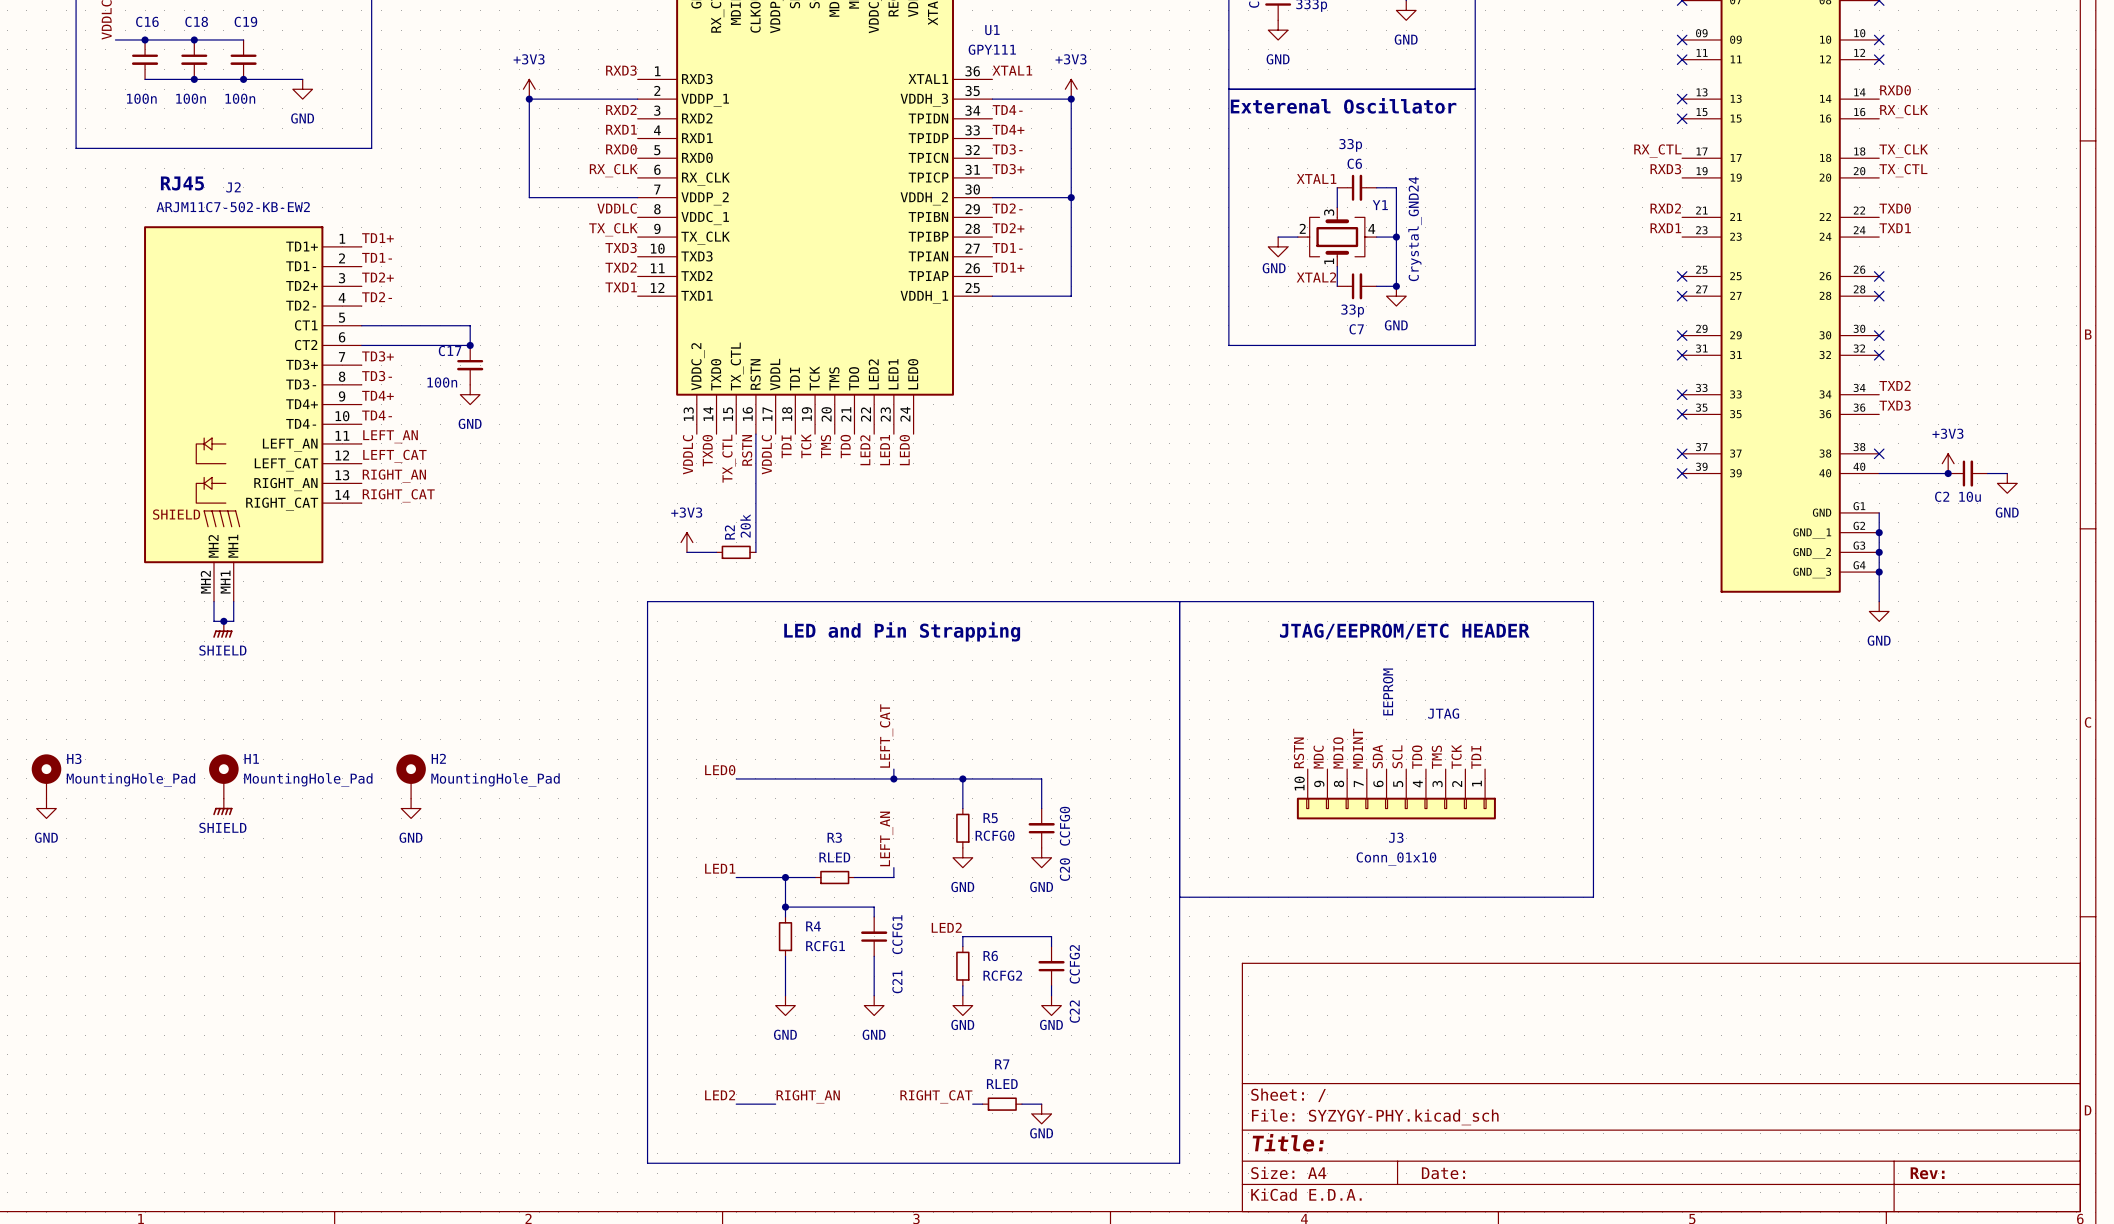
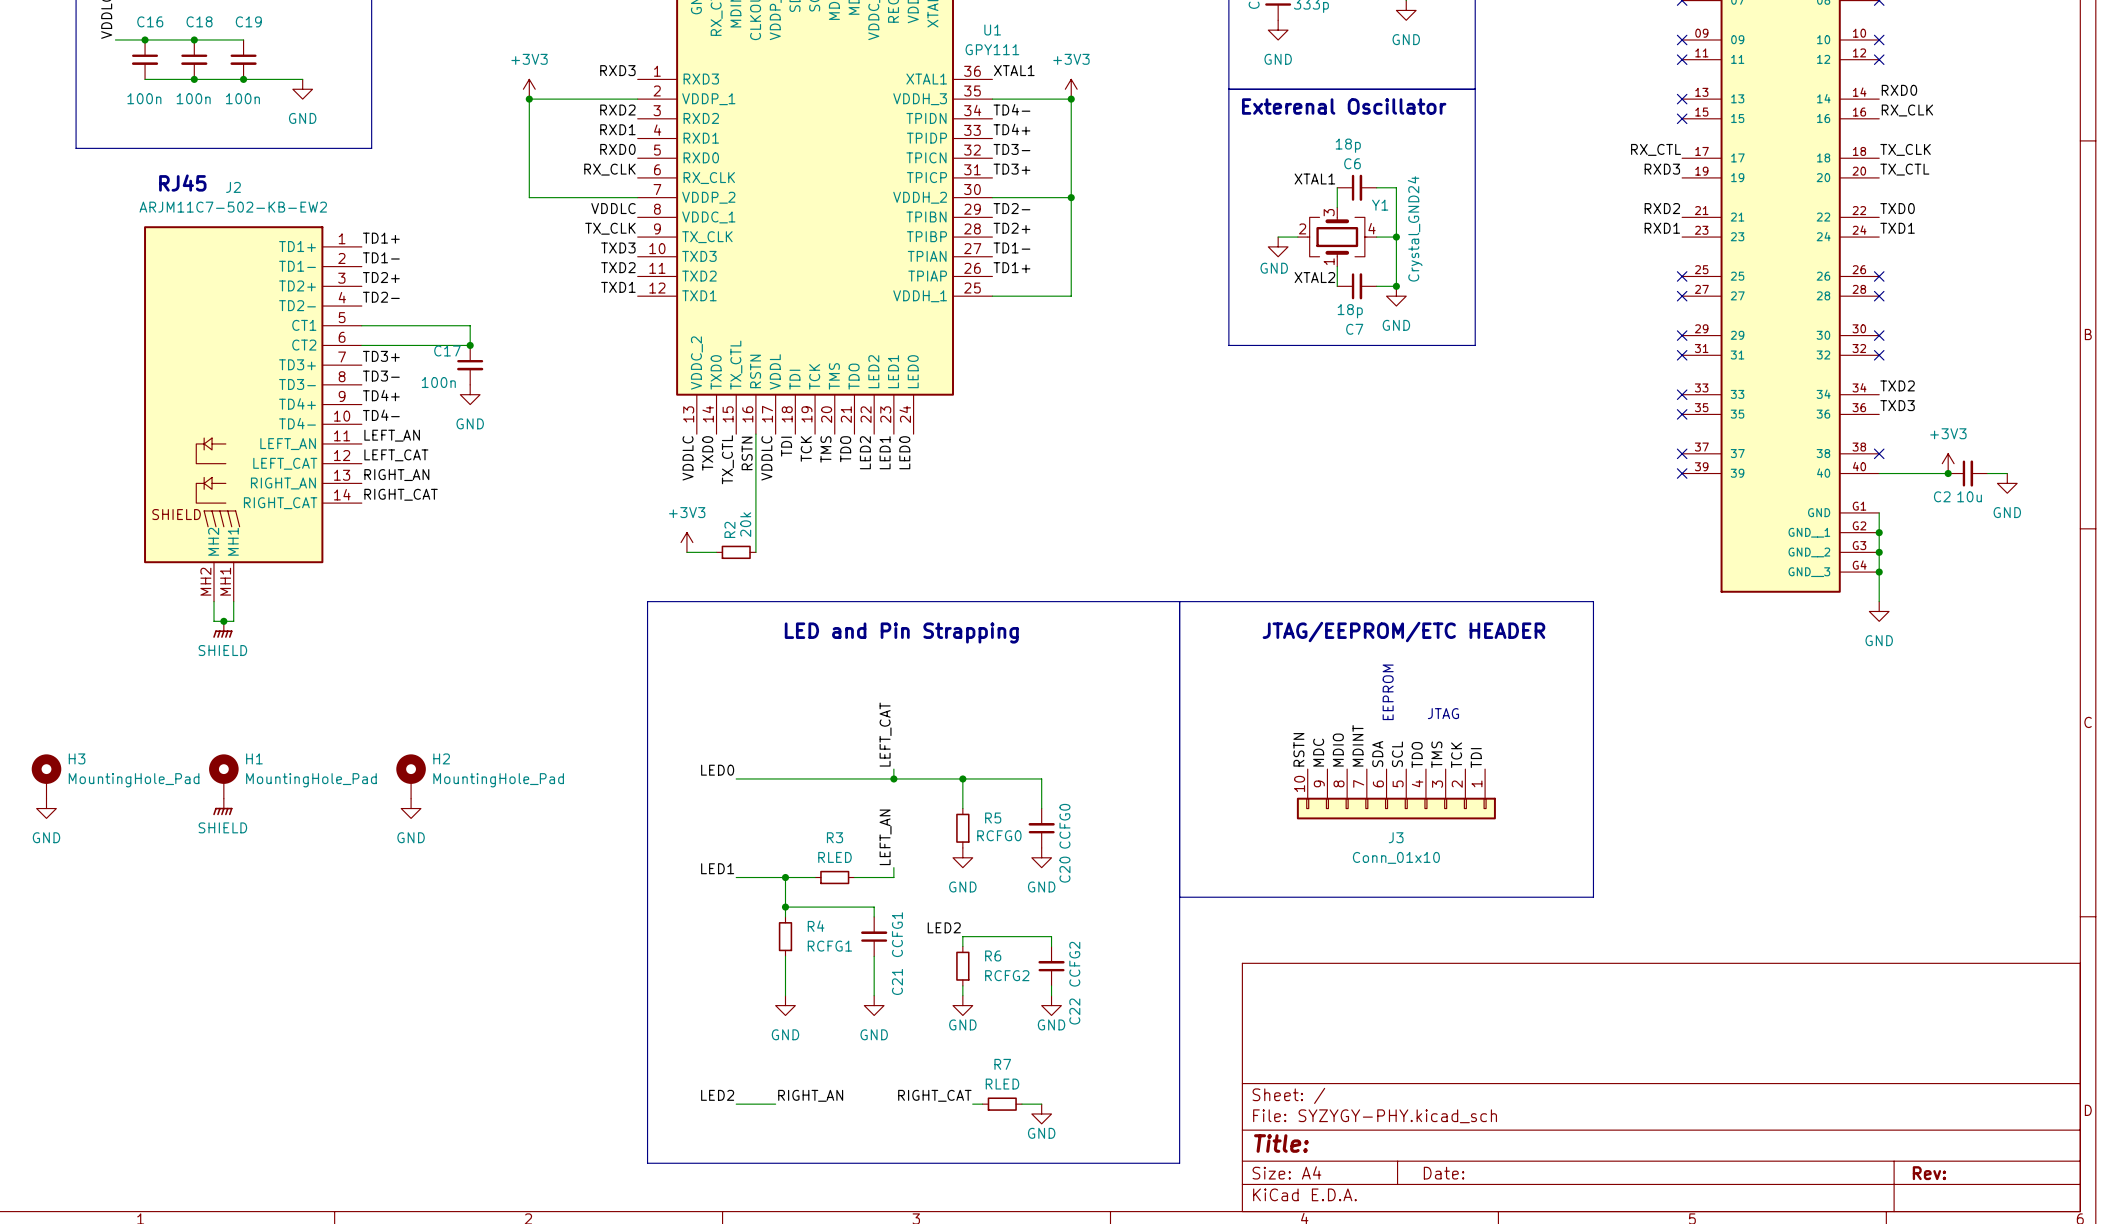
C6 value: 33p (1350, 145) -> 18p (1348, 145)
C7 value: 33p (1352, 310) -> 18p (1350, 311)

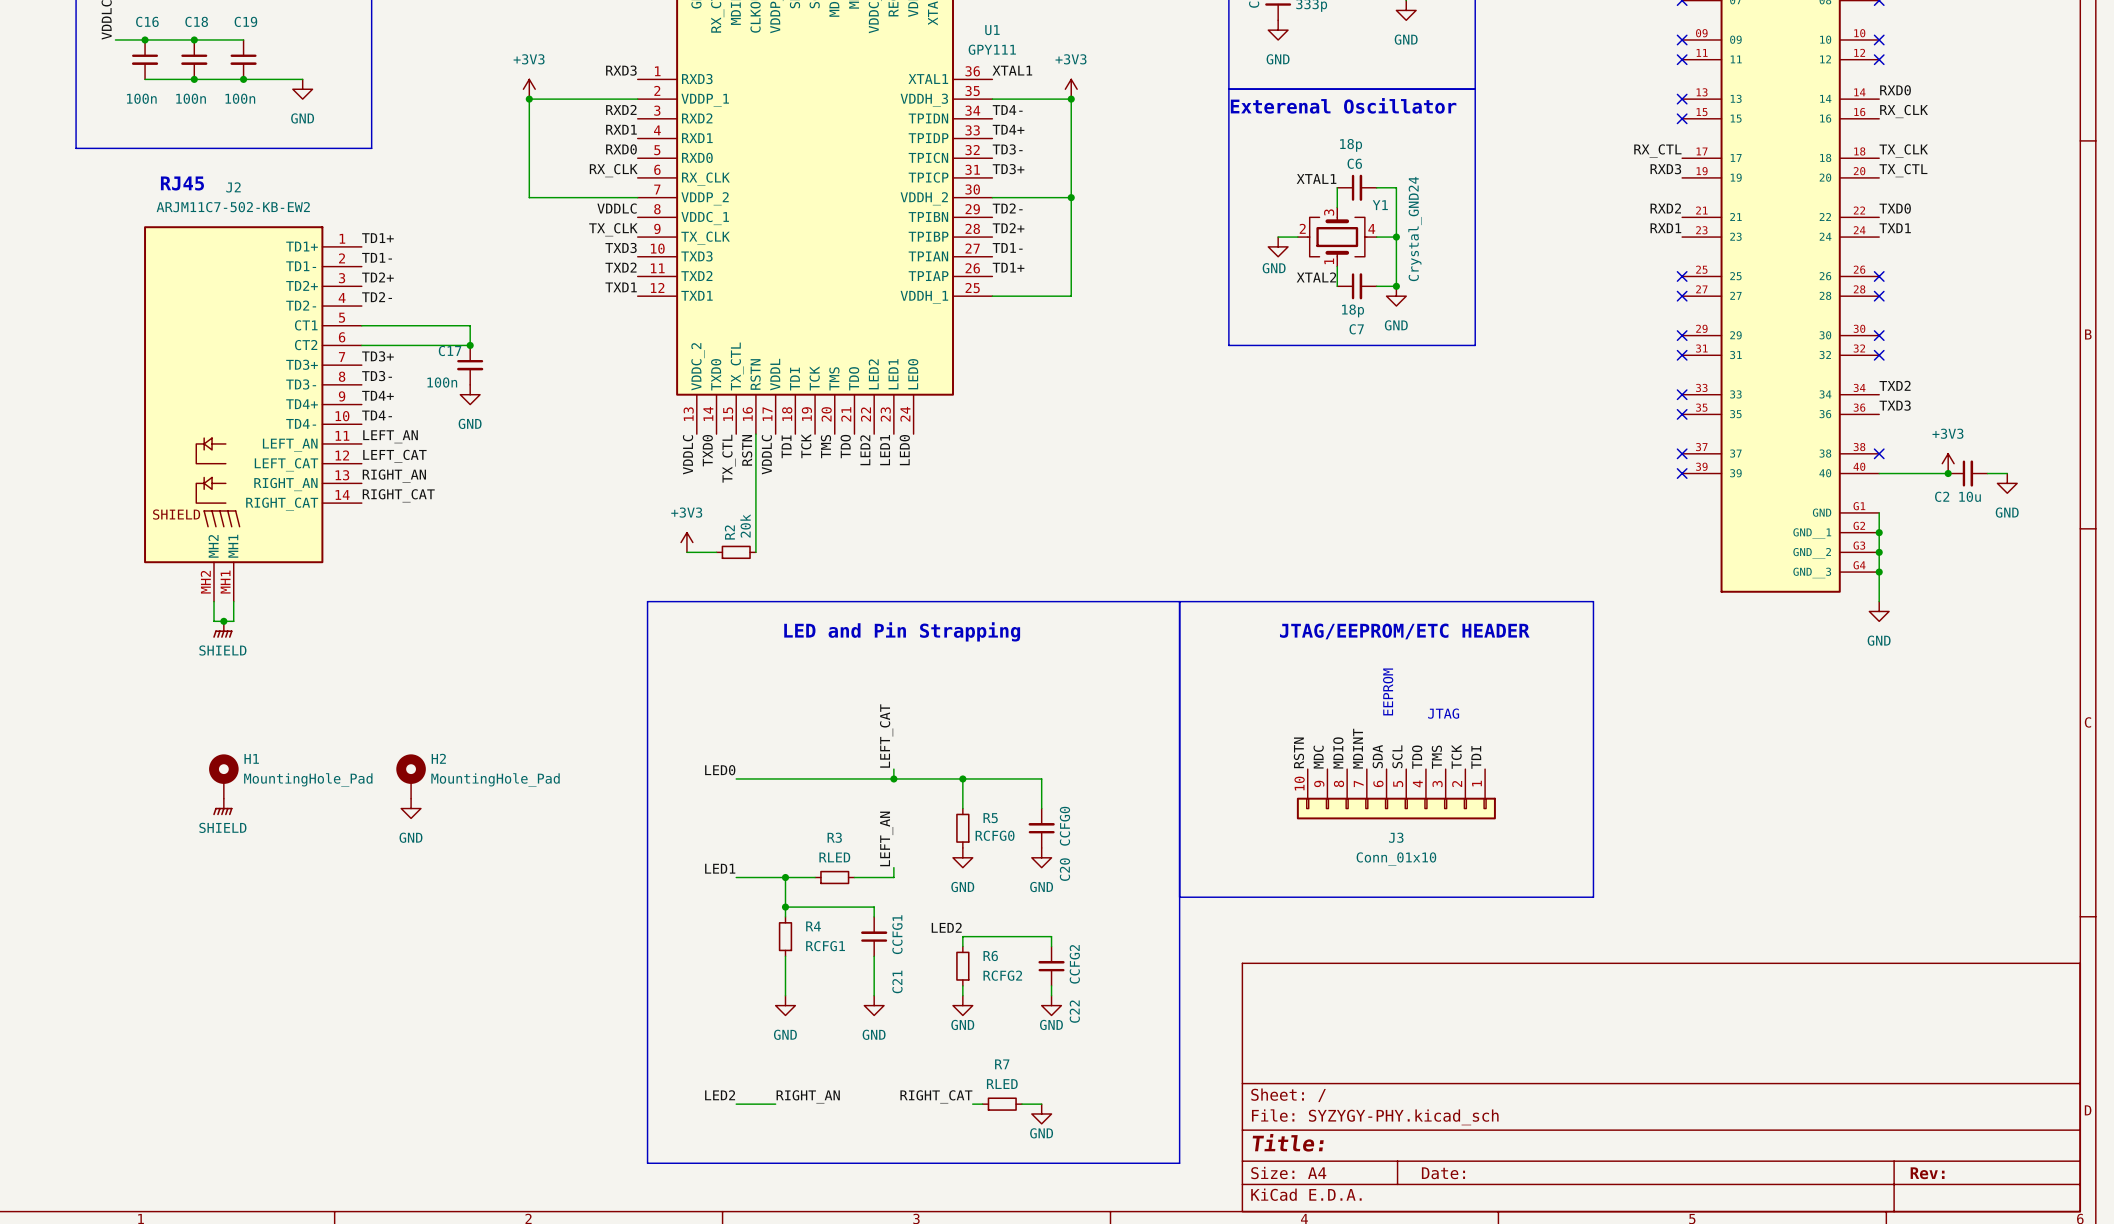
H3: MountingHole_Pad (46, 776) -> none
power symbol: GND (46, 808) -> none

